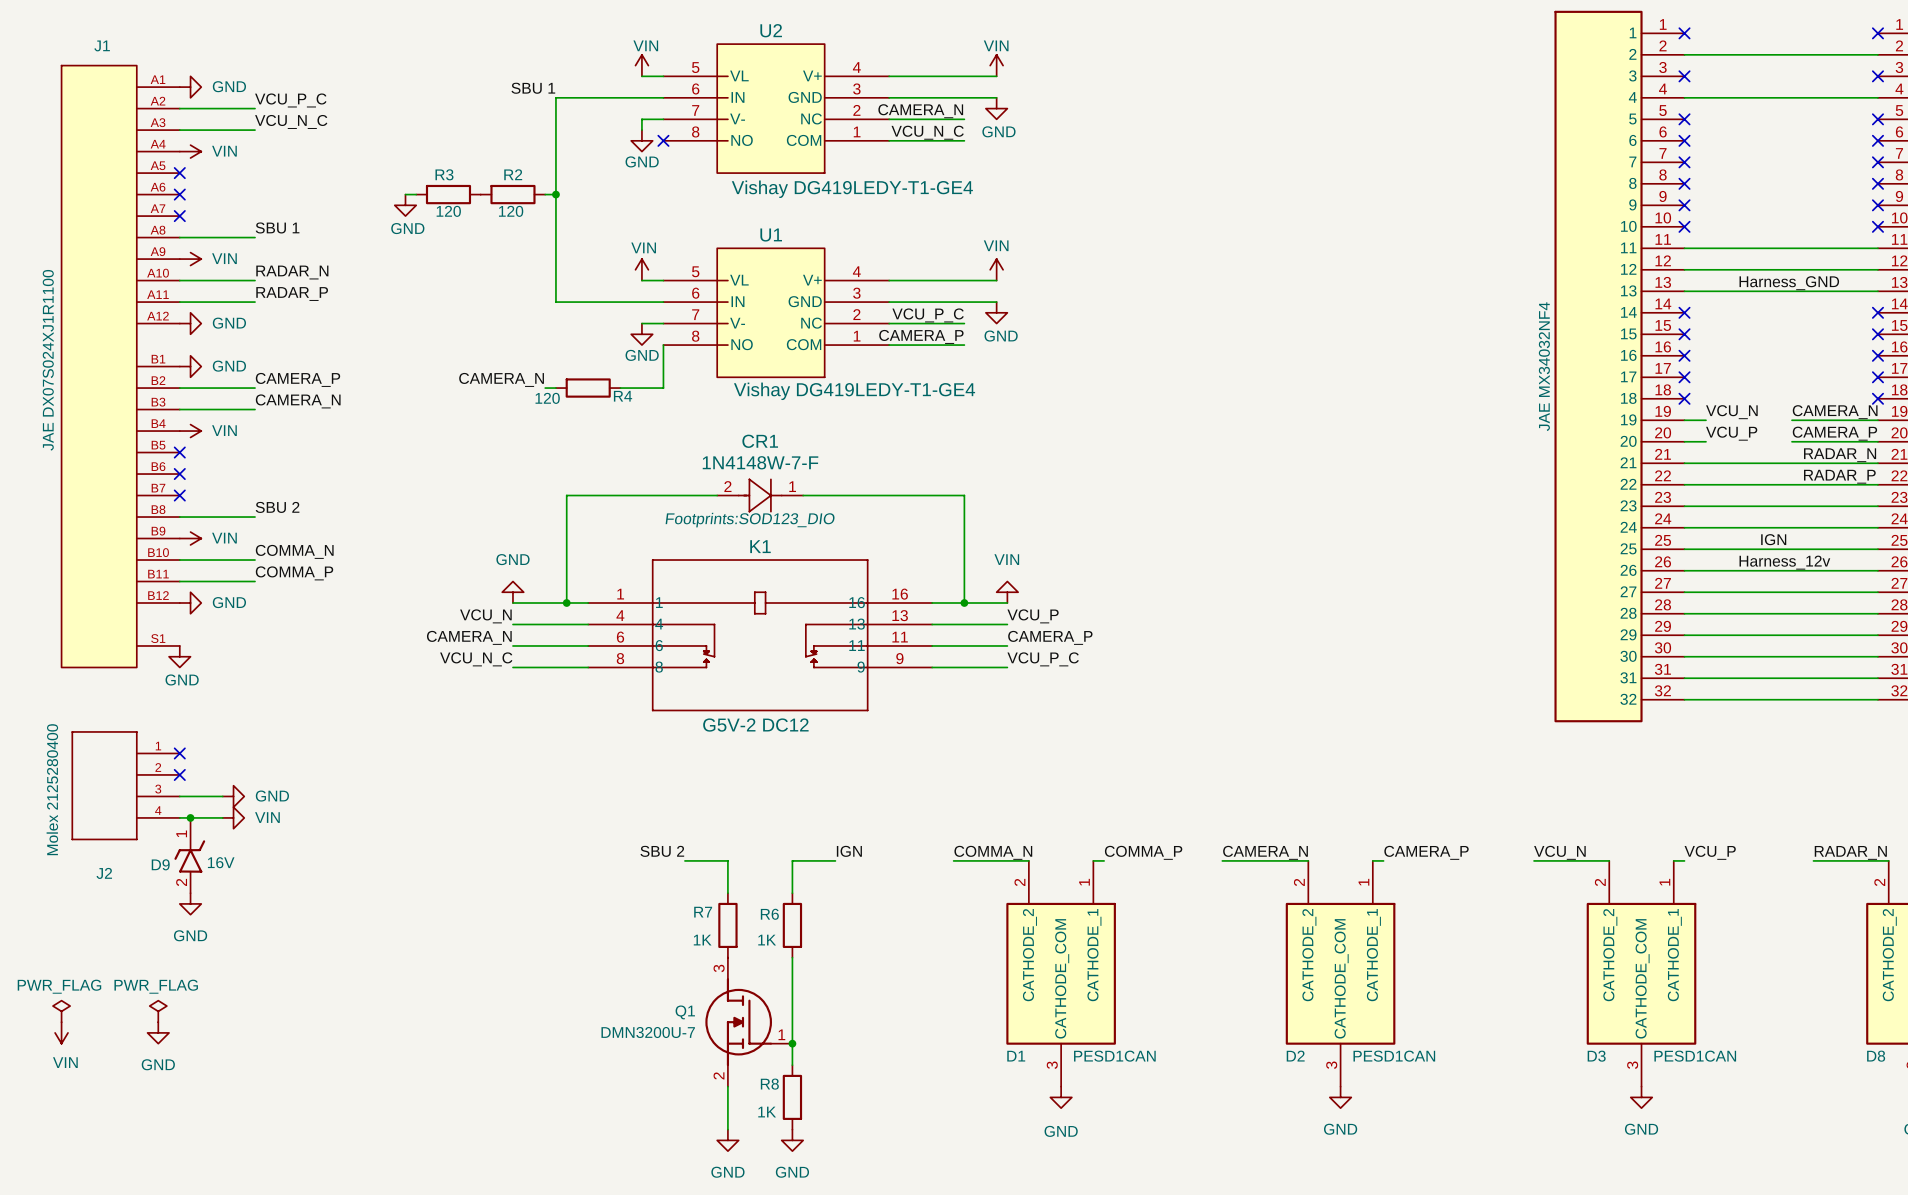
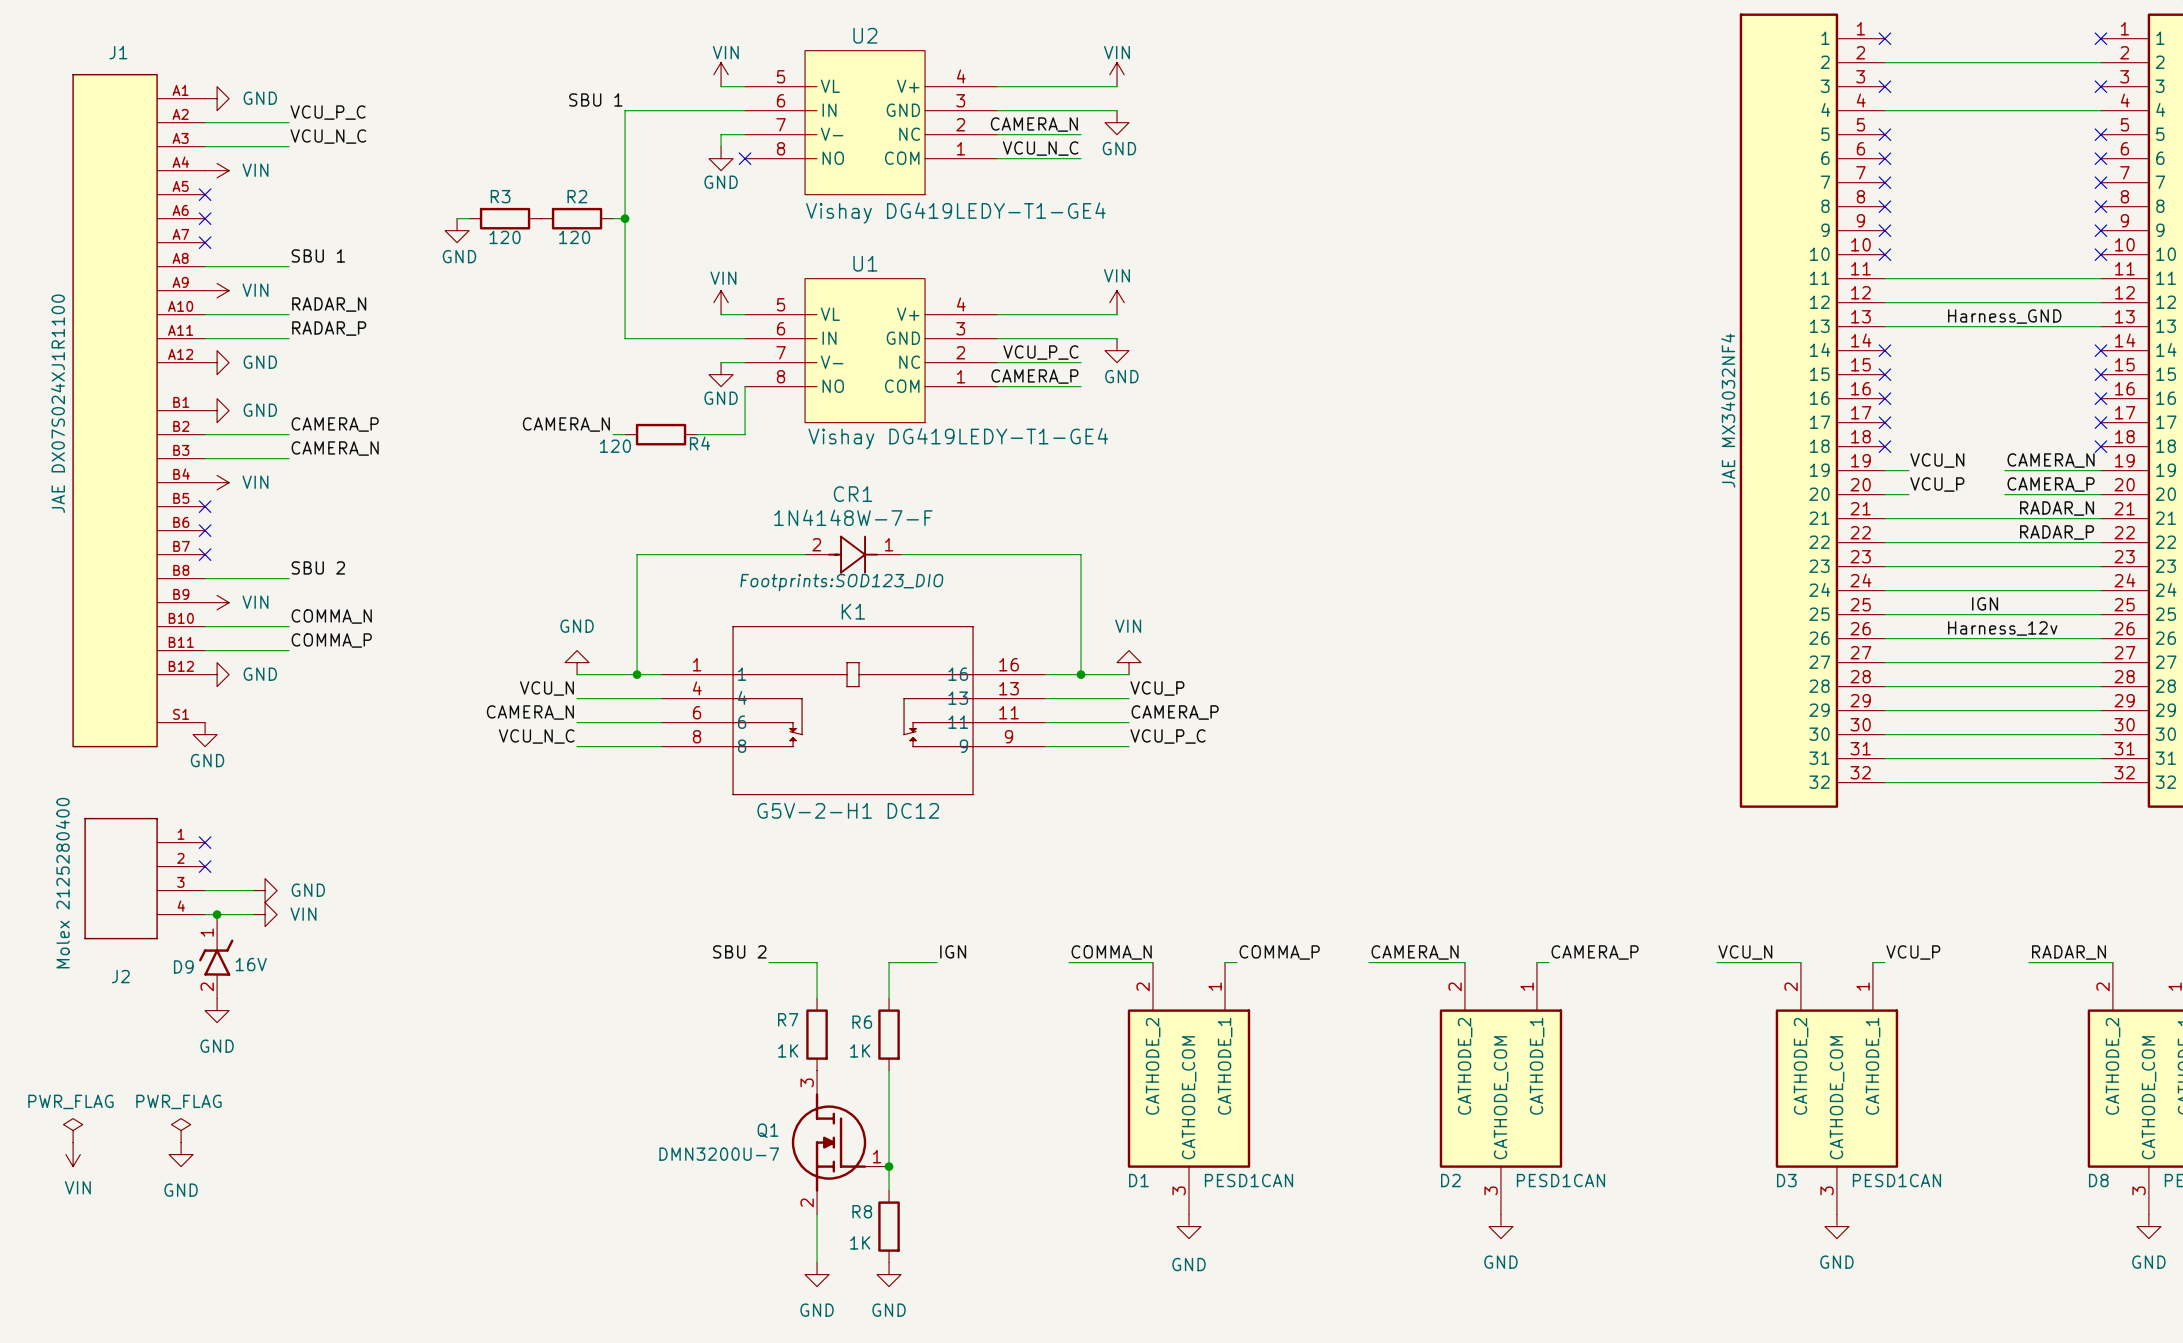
K1 value: G5V-2 DC12 (755, 725) -> G5V-2-H1 DC12 (848, 810)

